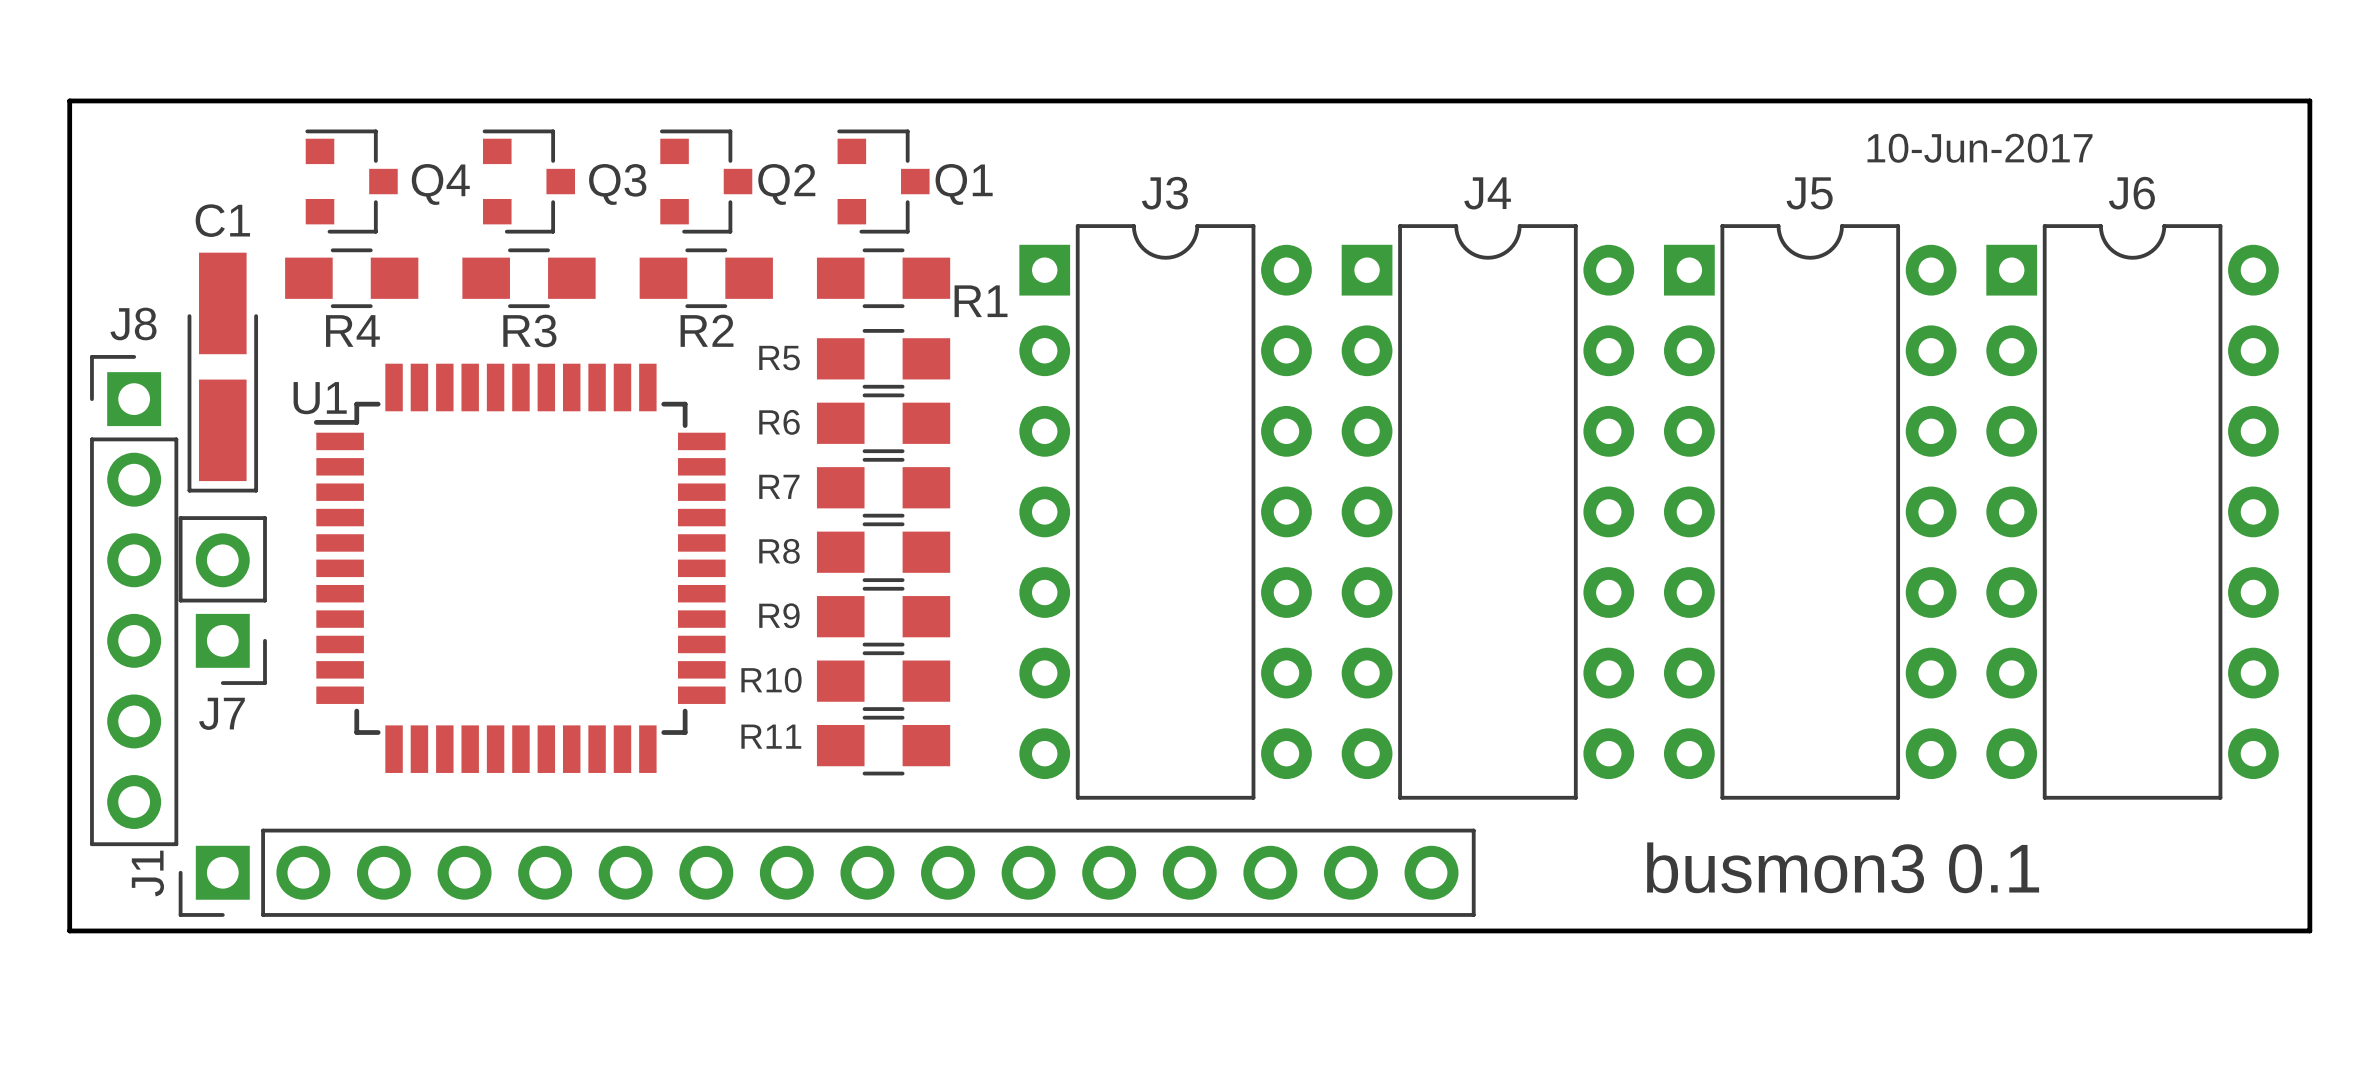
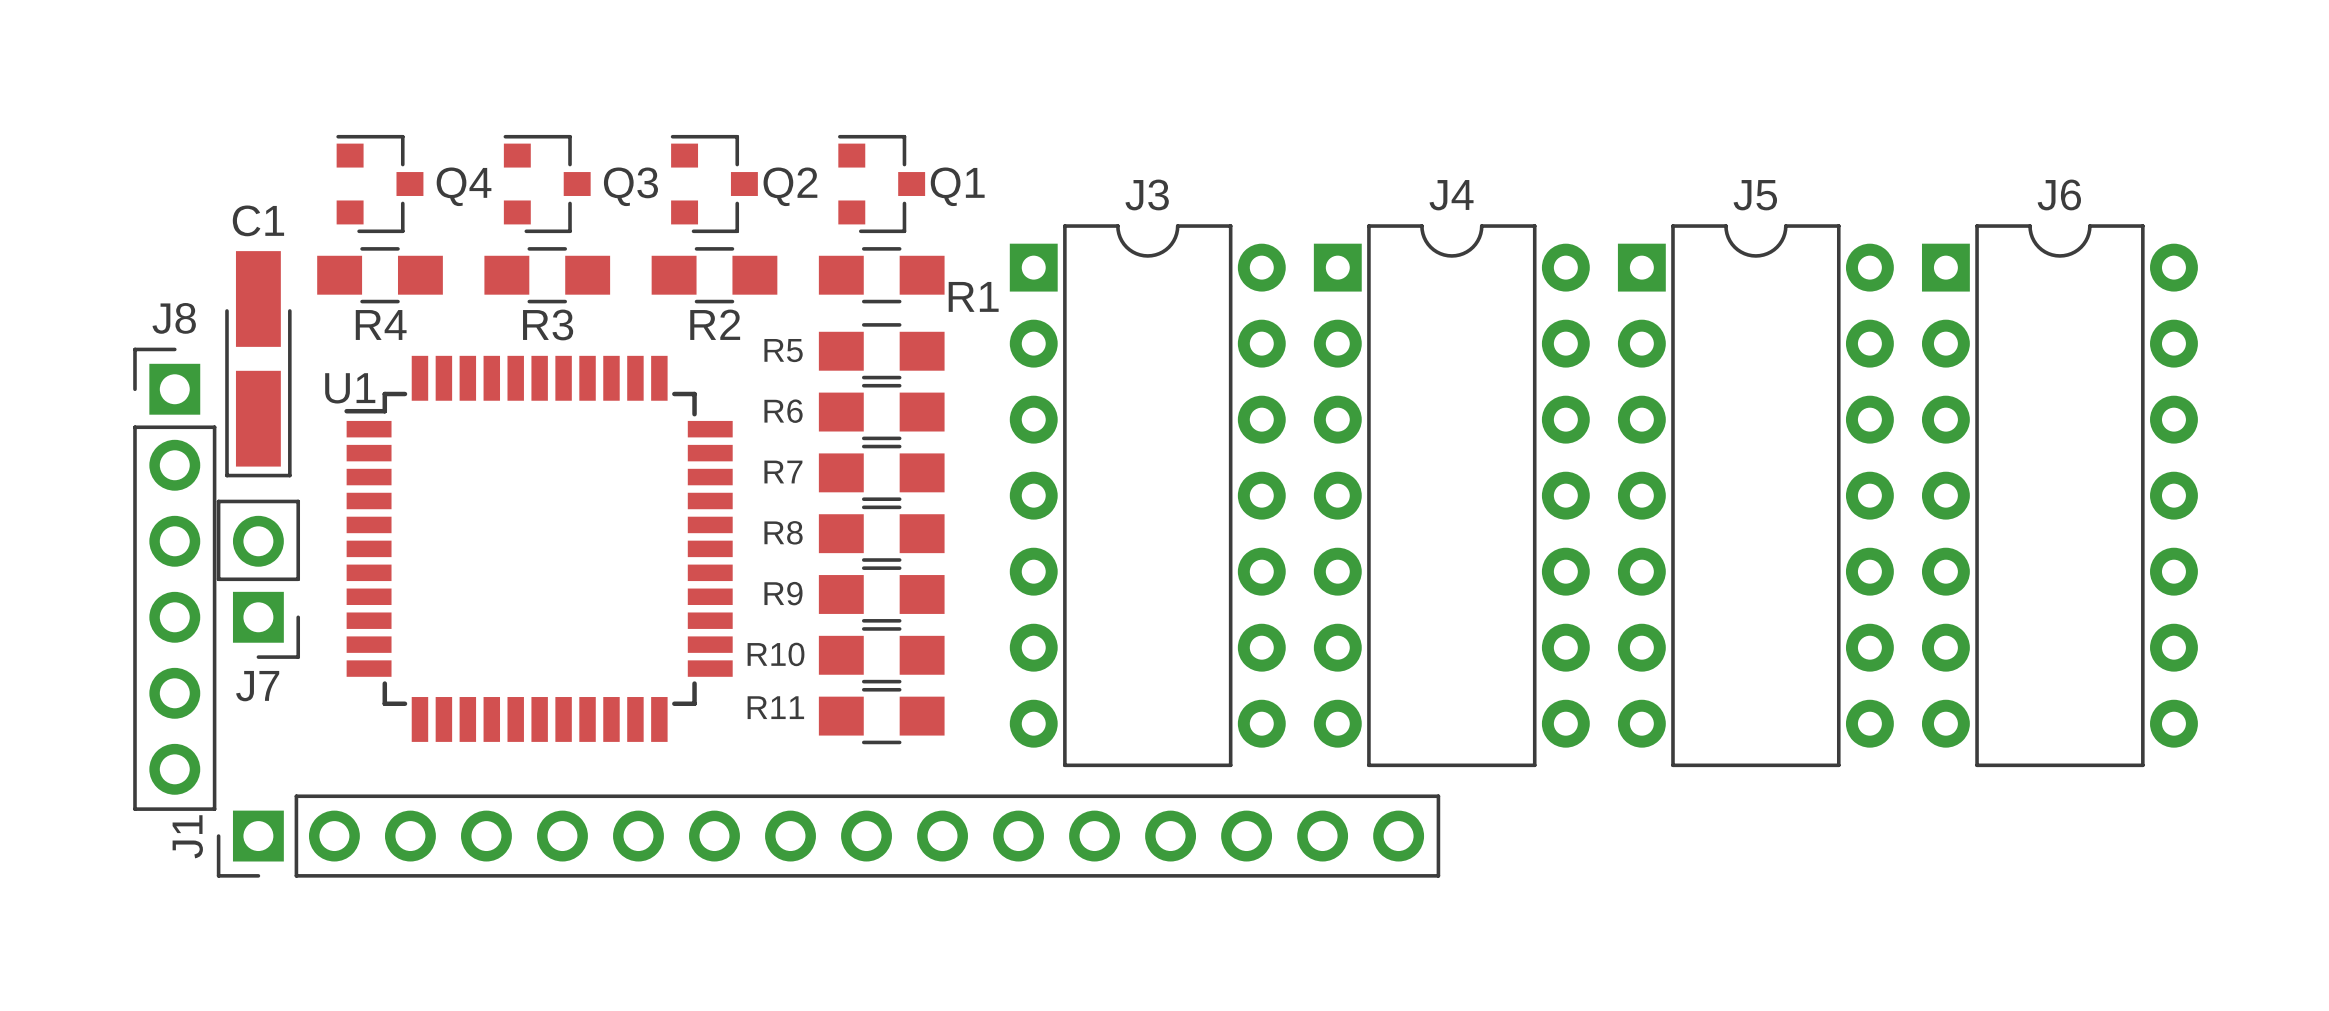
board edge: (69, 100) (69, 930) (2309, 930) (2309, 100) (69, 100) -> none
text: 10-Jun-2017 (1980, 148) -> none
text: busmon3 0.1 (1843, 867) -> none

